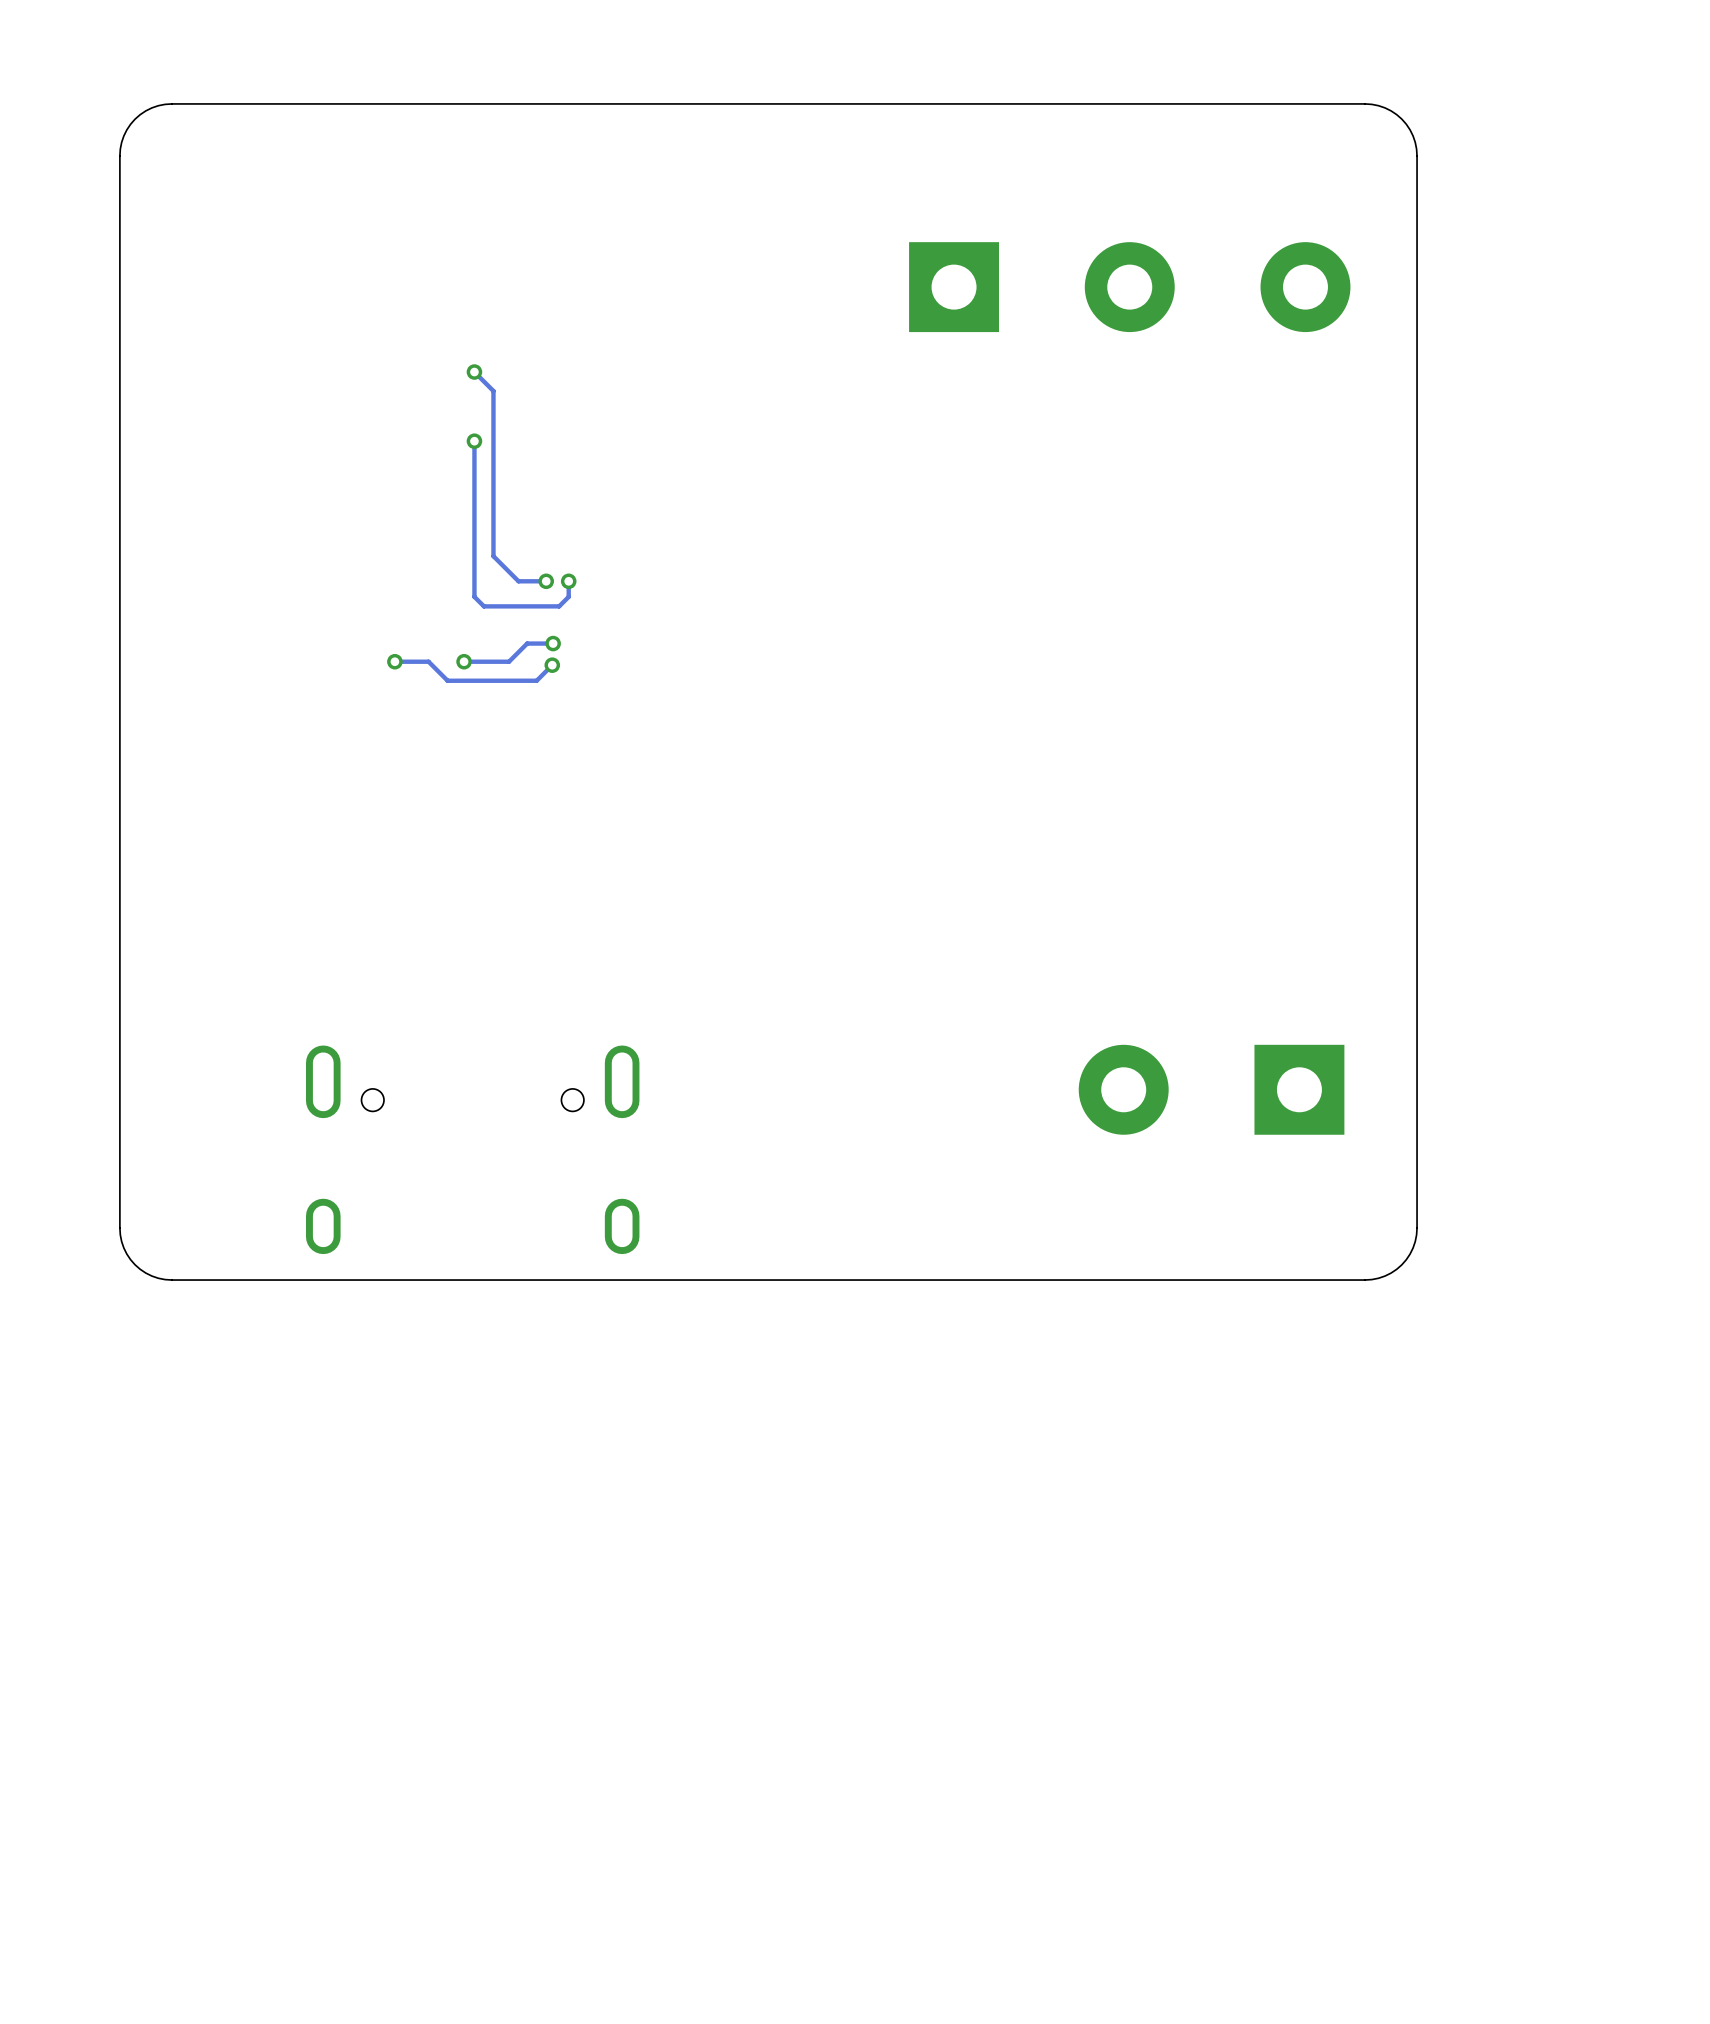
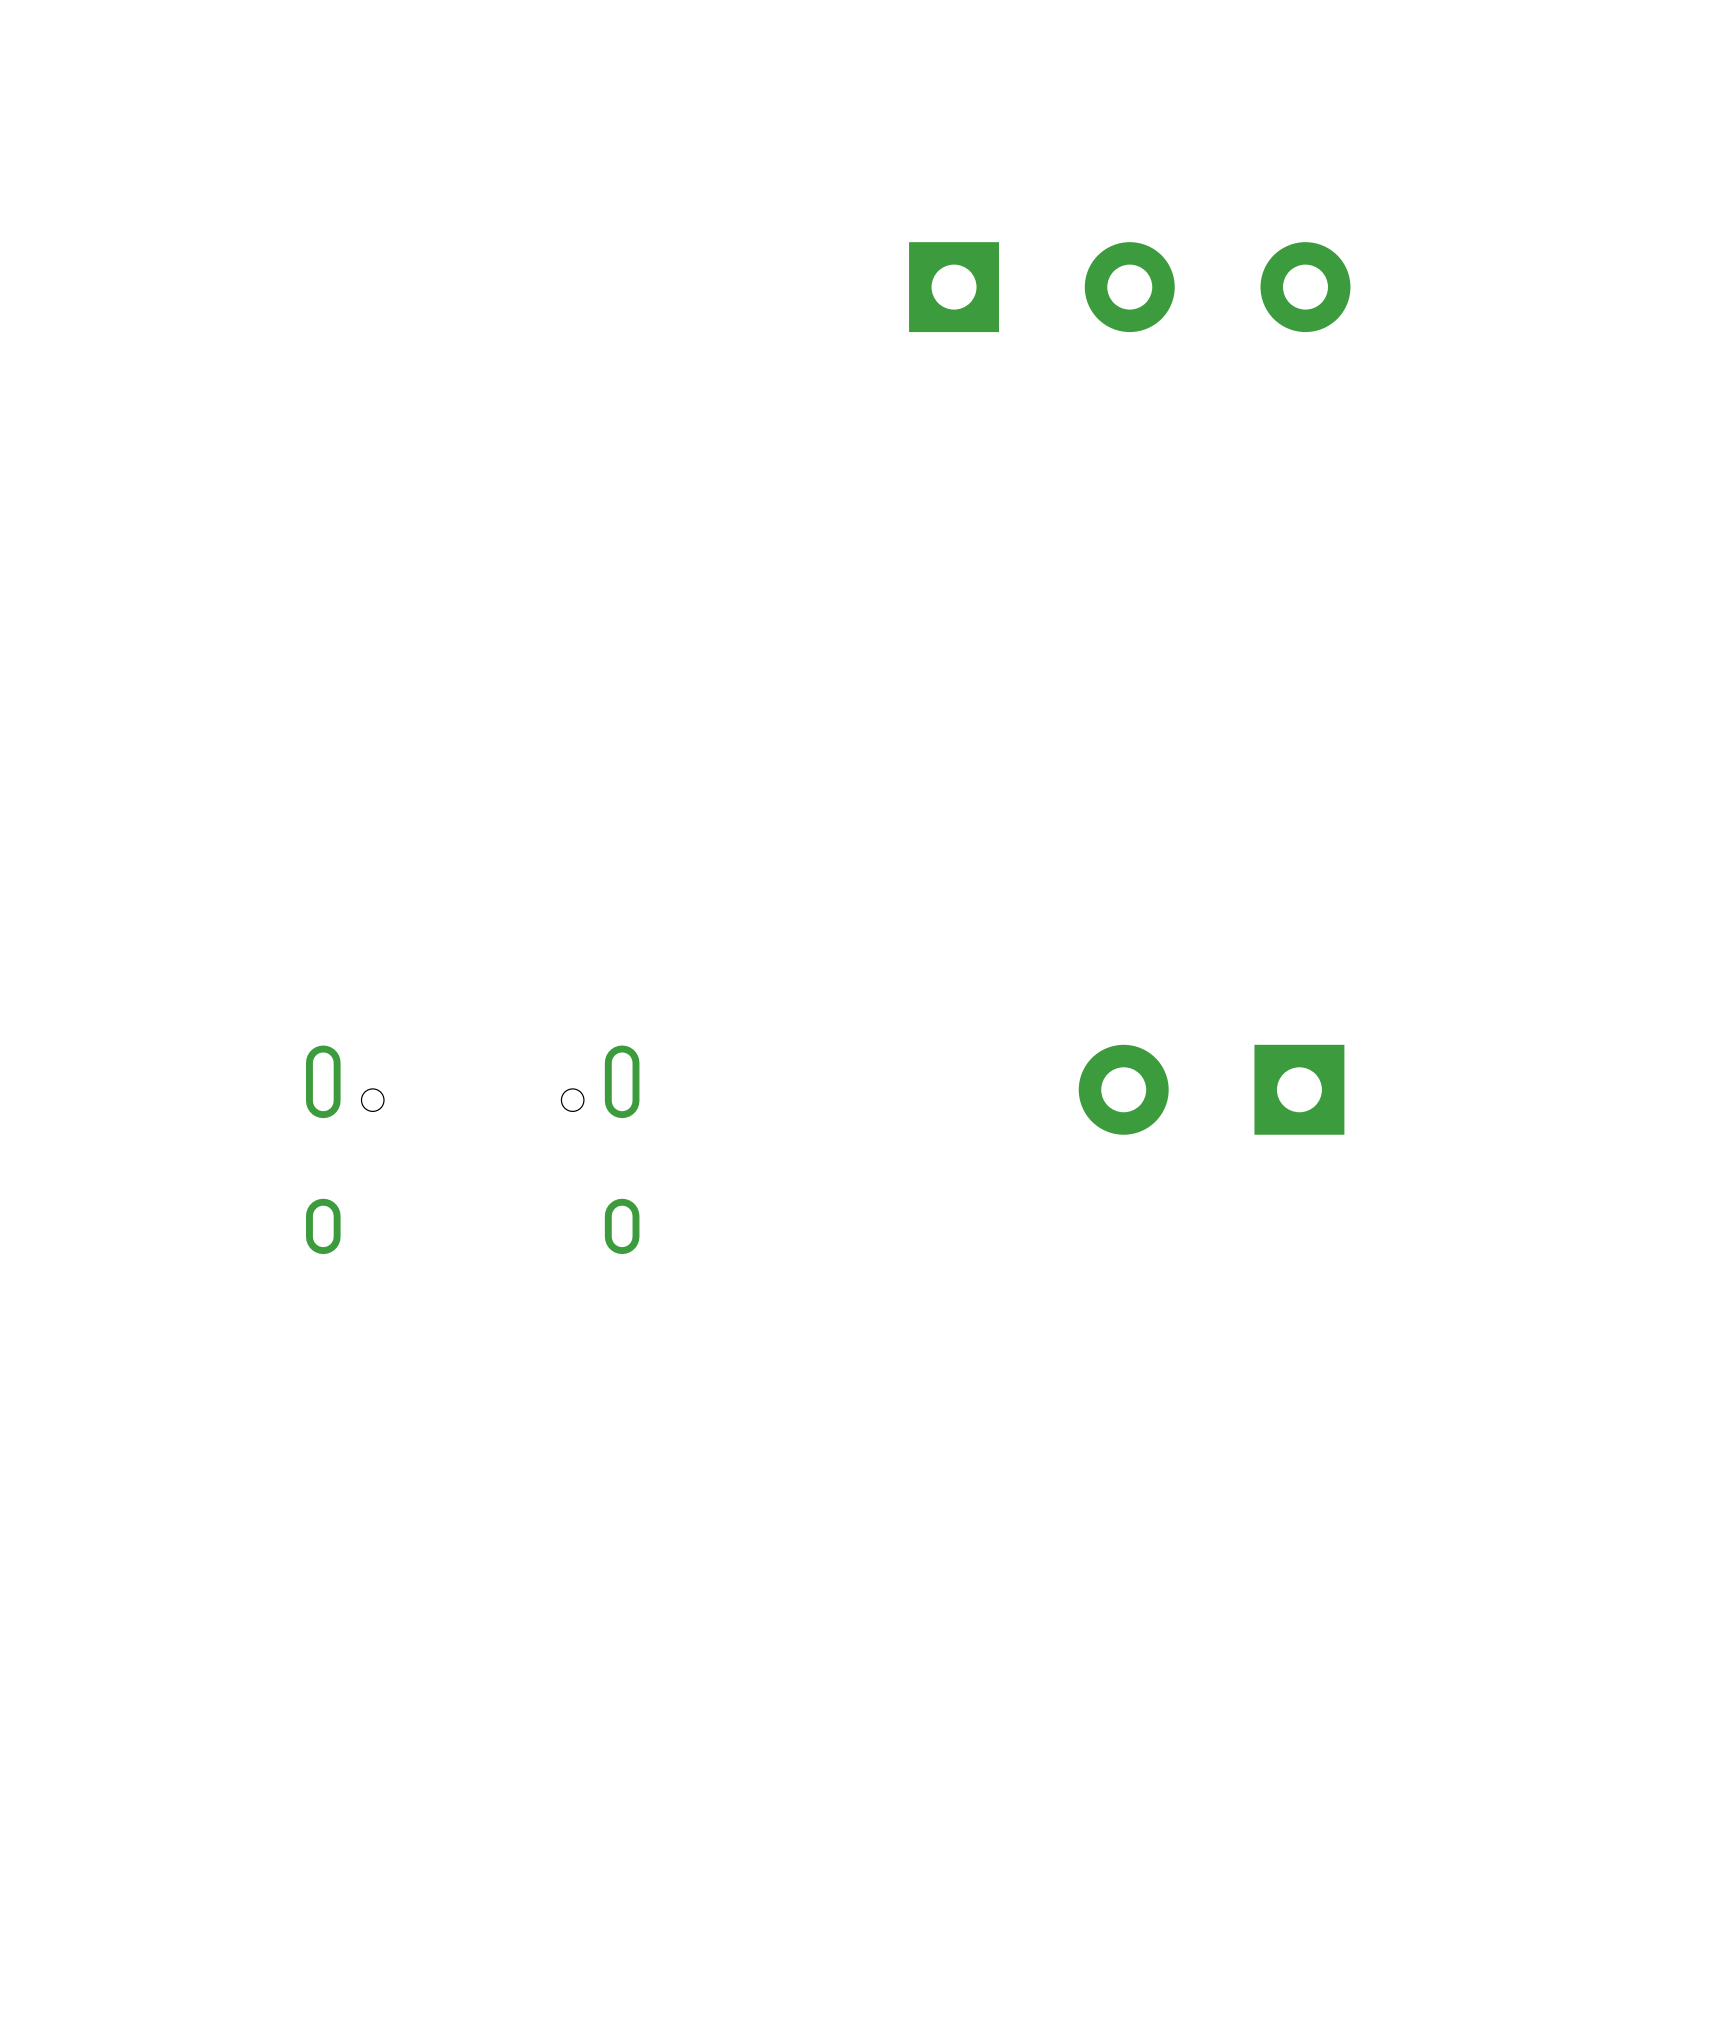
board edge: (1365, 103) (171, 103) (151, 107) (135, 119) (123, 135) (119, 155) (119, 1228) (123, 1247) (135, 1264) (151, 1276) (171, 1280) (1365, 1280) (1385, 1276) (1401, 1264) (1413, 1247) (1417, 1228) (1417, 155) (1413, 135) (1401, 119) (1385, 107) (1365, 103) -> none
track: (474, 372) (493, 391) (493, 556) (518, 581) (546, 581) -> none
via: (474, 372) -> none
track: (474, 441) (474, 596) (483, 606) (559, 606) (568, 596) (568, 581) -> none
via: (474, 441) -> none
via: (546, 581) -> none
via: (568, 581) -> none
track: (553, 643) (527, 643) (509, 661) (464, 661) -> none
via: (553, 643) -> none
track: (394, 661) (428, 661) (447, 680) (536, 680) (552, 665) -> none
via: (394, 661) -> none
via: (464, 661) -> none
via: (552, 665) -> none

